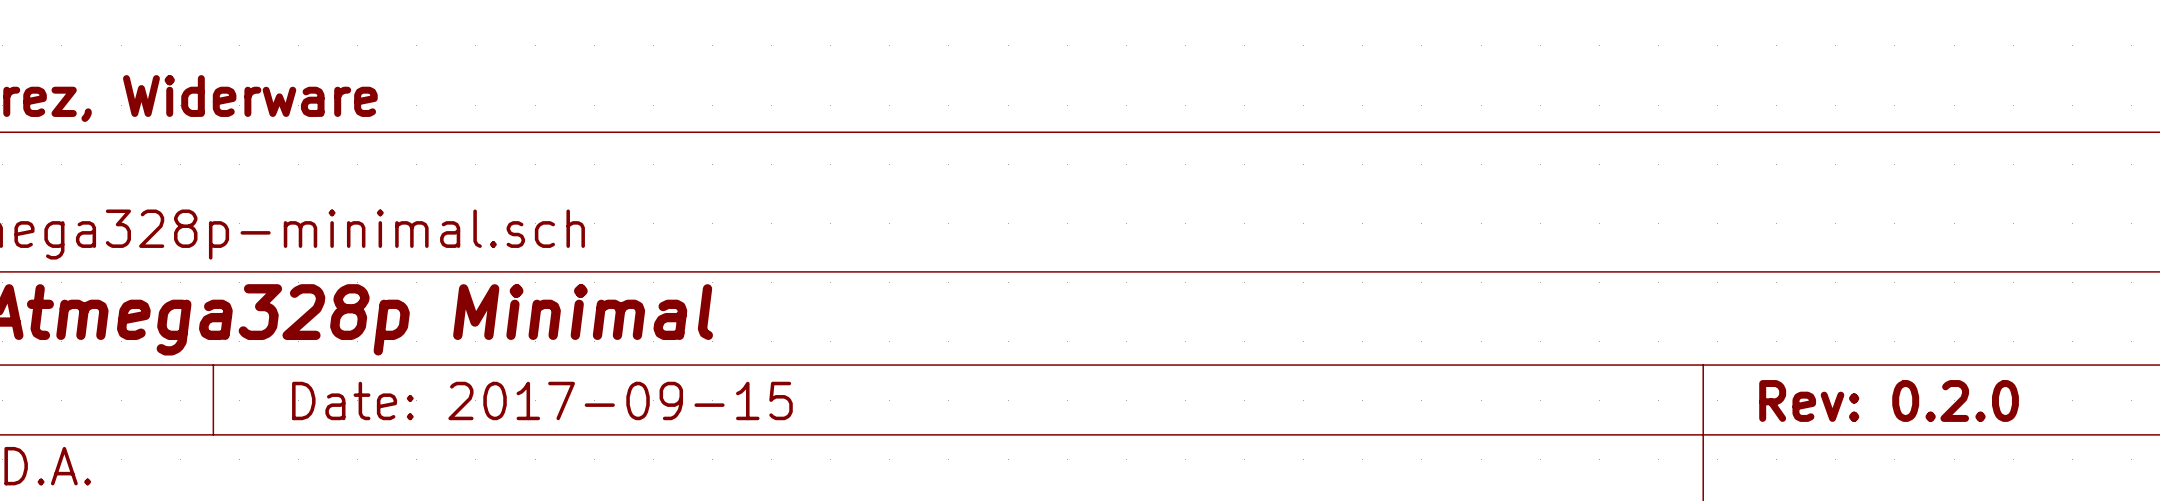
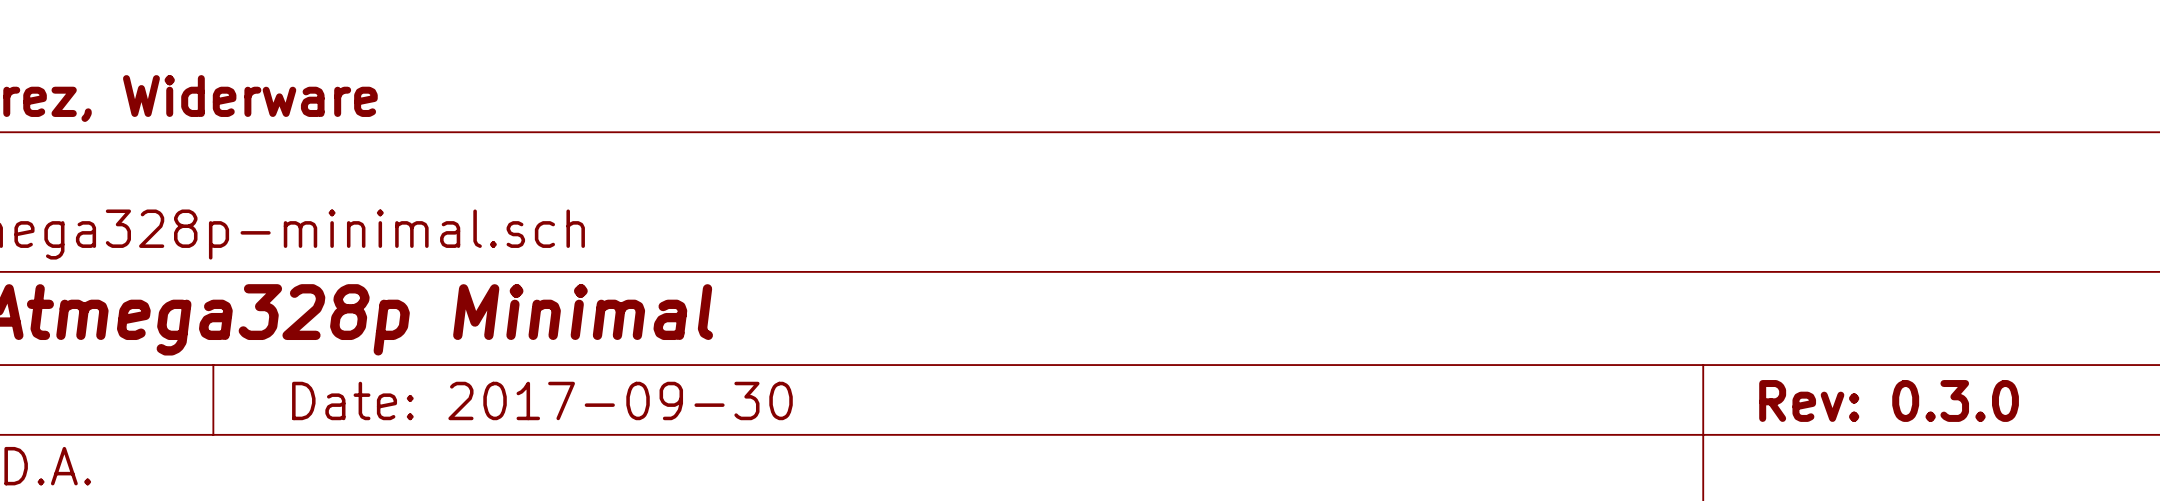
title block: Date: 2017-09-15 (542, 400) -> Date: 2017-09-30 (542, 400)
title block: Rev: 0.2.0 (1889, 400) -> Rev: 0.3.0 (1889, 400)

